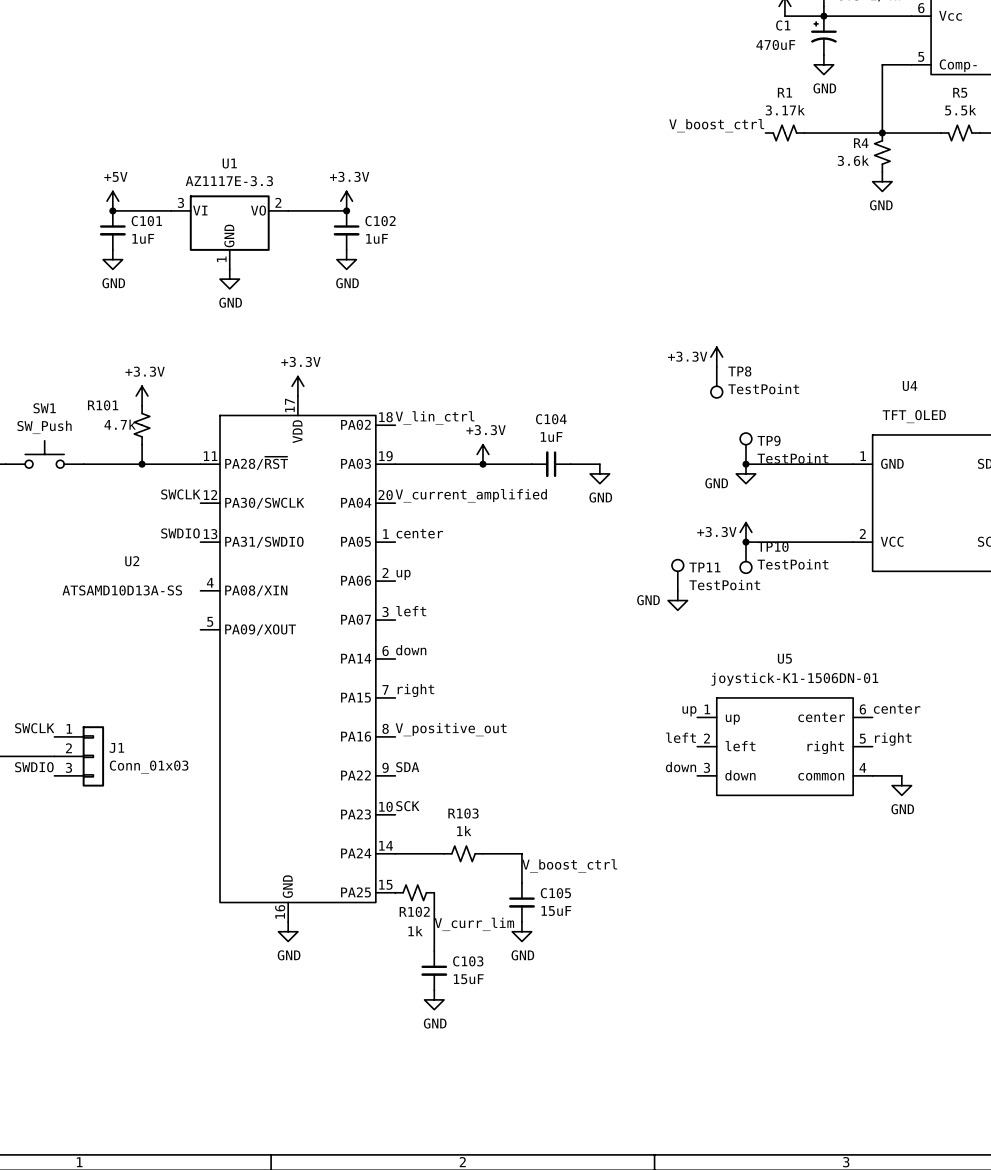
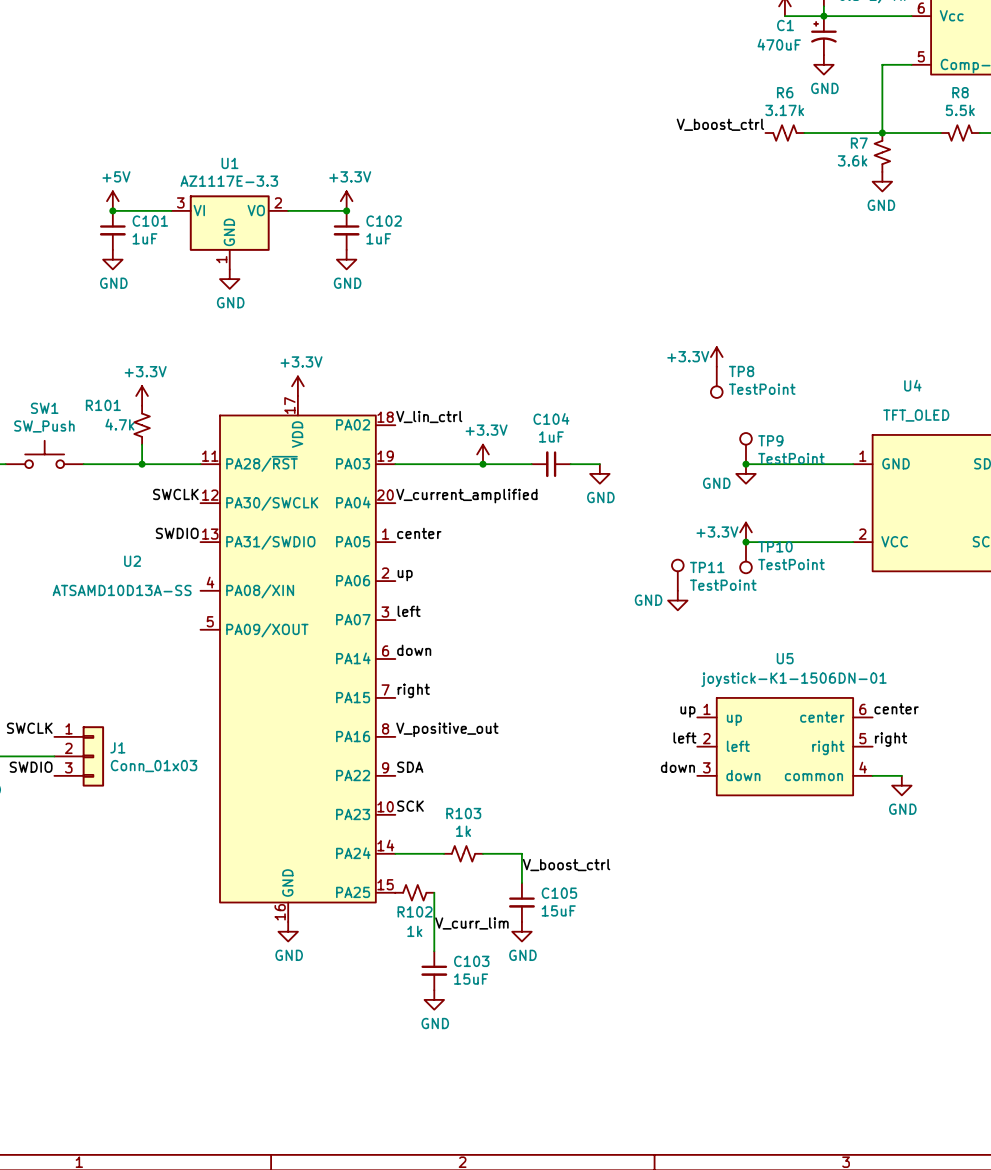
R1 name: R1 (784, 92) -> R6 (785, 92)
R5 name: R5 (960, 92) -> R8 (960, 92)
R4 name: R4 (861, 143) -> R7 (859, 143)

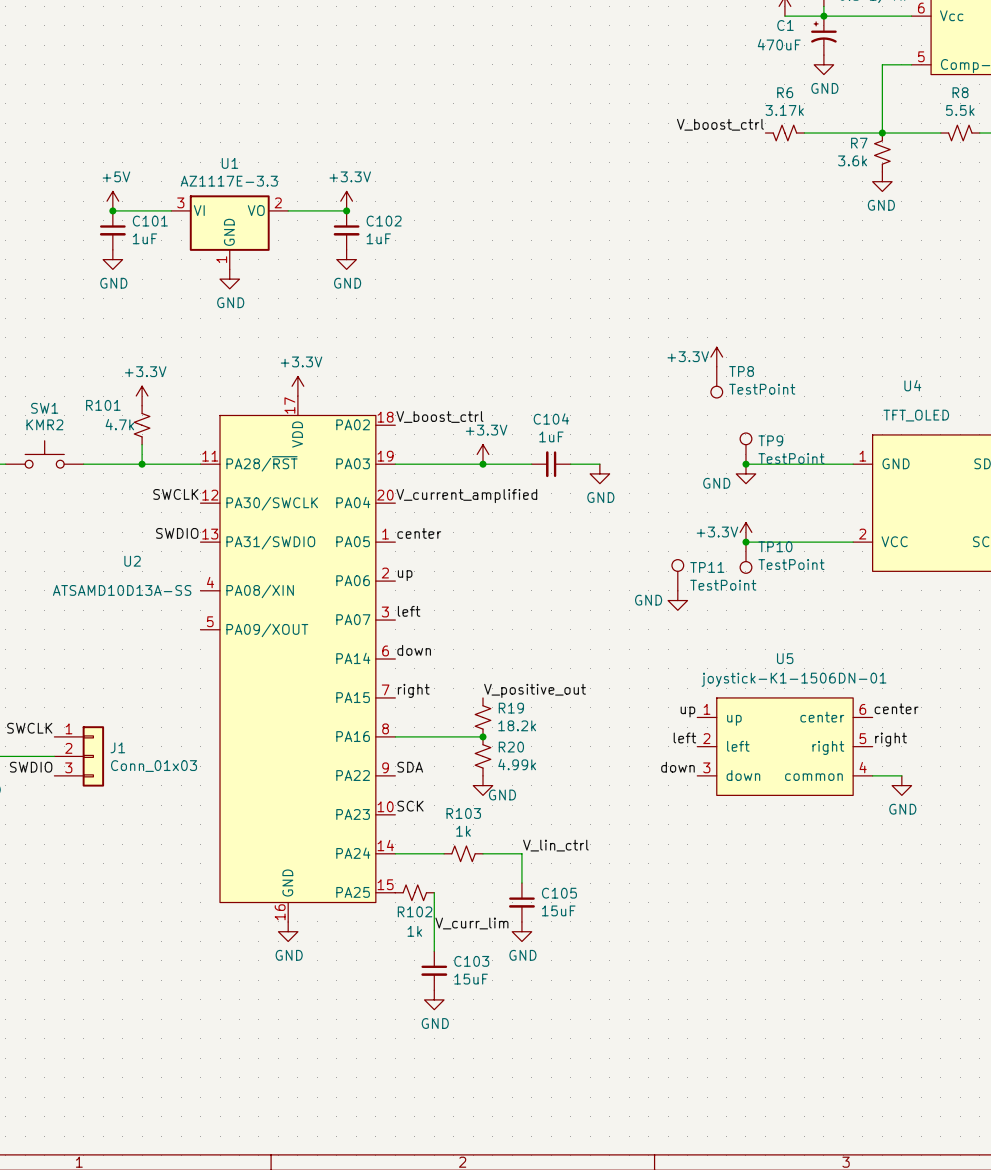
label: V_lin_ctrl (429, 416) -> V_boost_ctrl (439, 416)
SW1 value: SW_Push (44, 426) -> KMR2 (44, 424)
R19: none -> 18.2k (483, 717)
label position: V_positive_out (447, 729) -> V_positive_out (535, 690)
wire: none -> (395, 736) (483, 736)
junction: none -> (483, 736)
R20: none -> 4.99k (483, 756)
power symbol: none -> GND (483, 785)
label: V_boost_ctrl (566, 865) -> V_lin_ctrl (555, 845)

